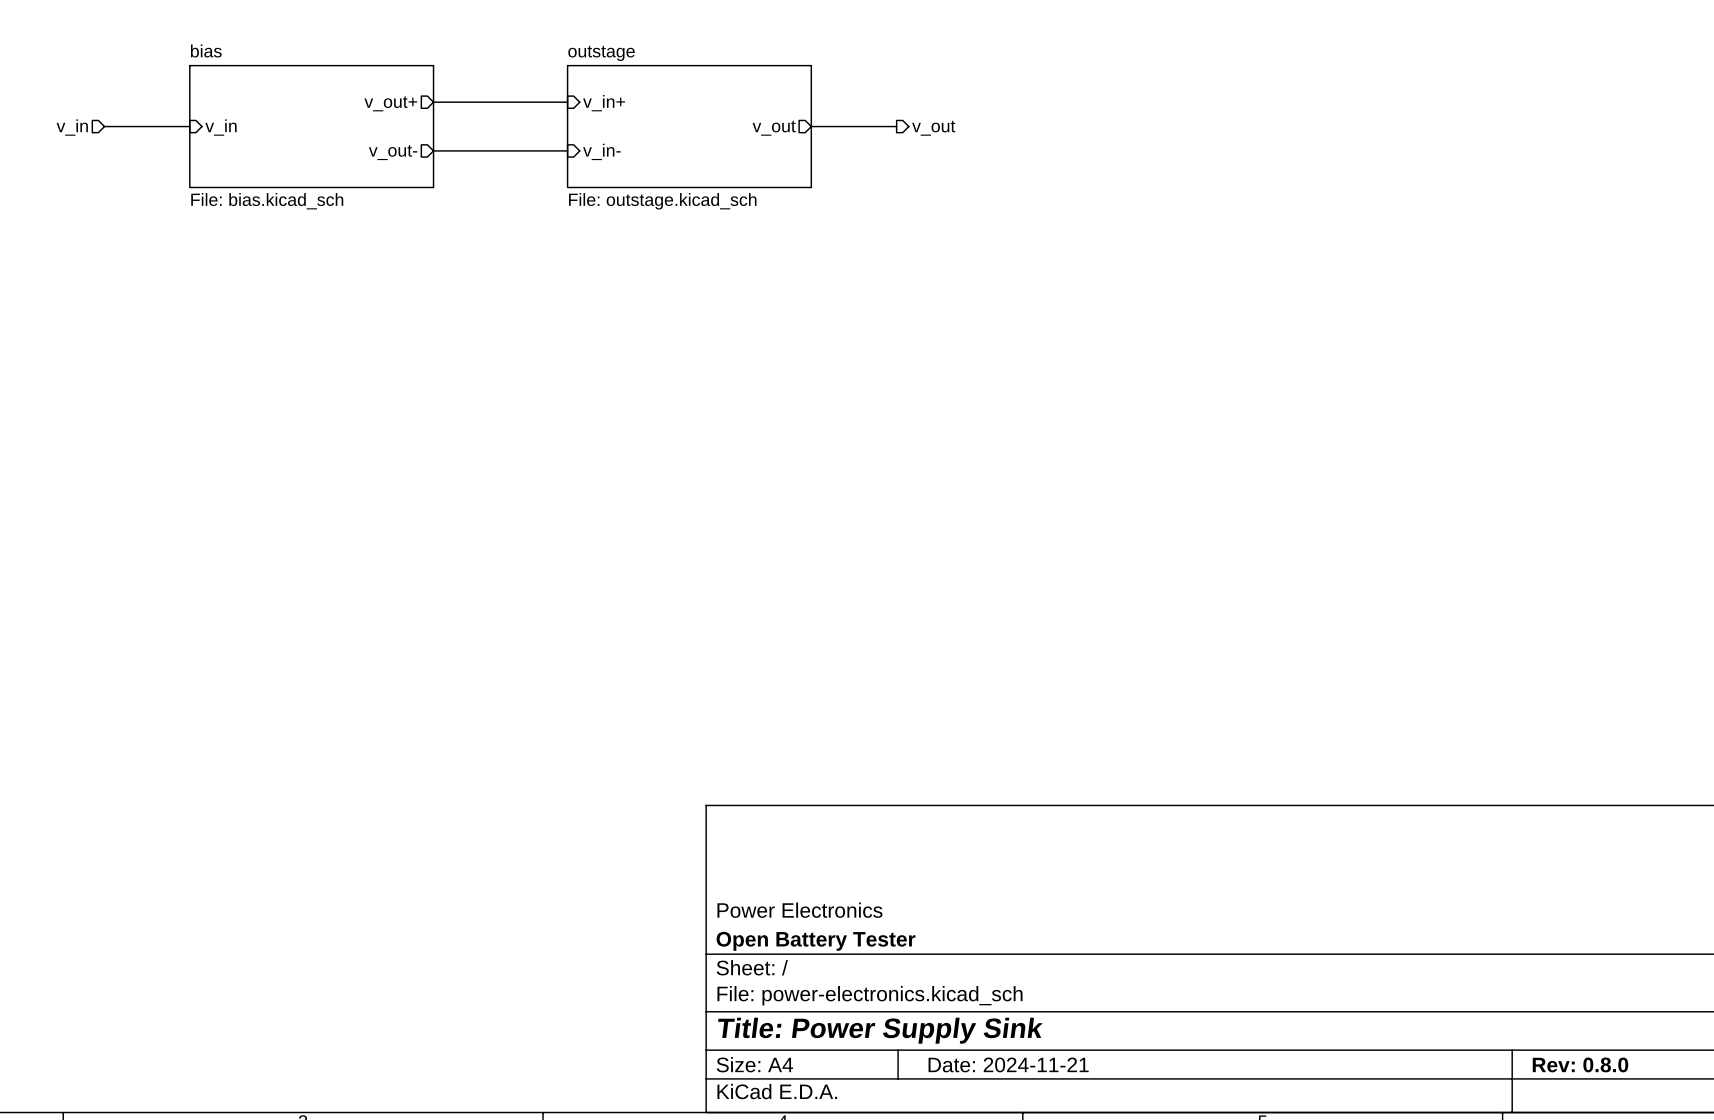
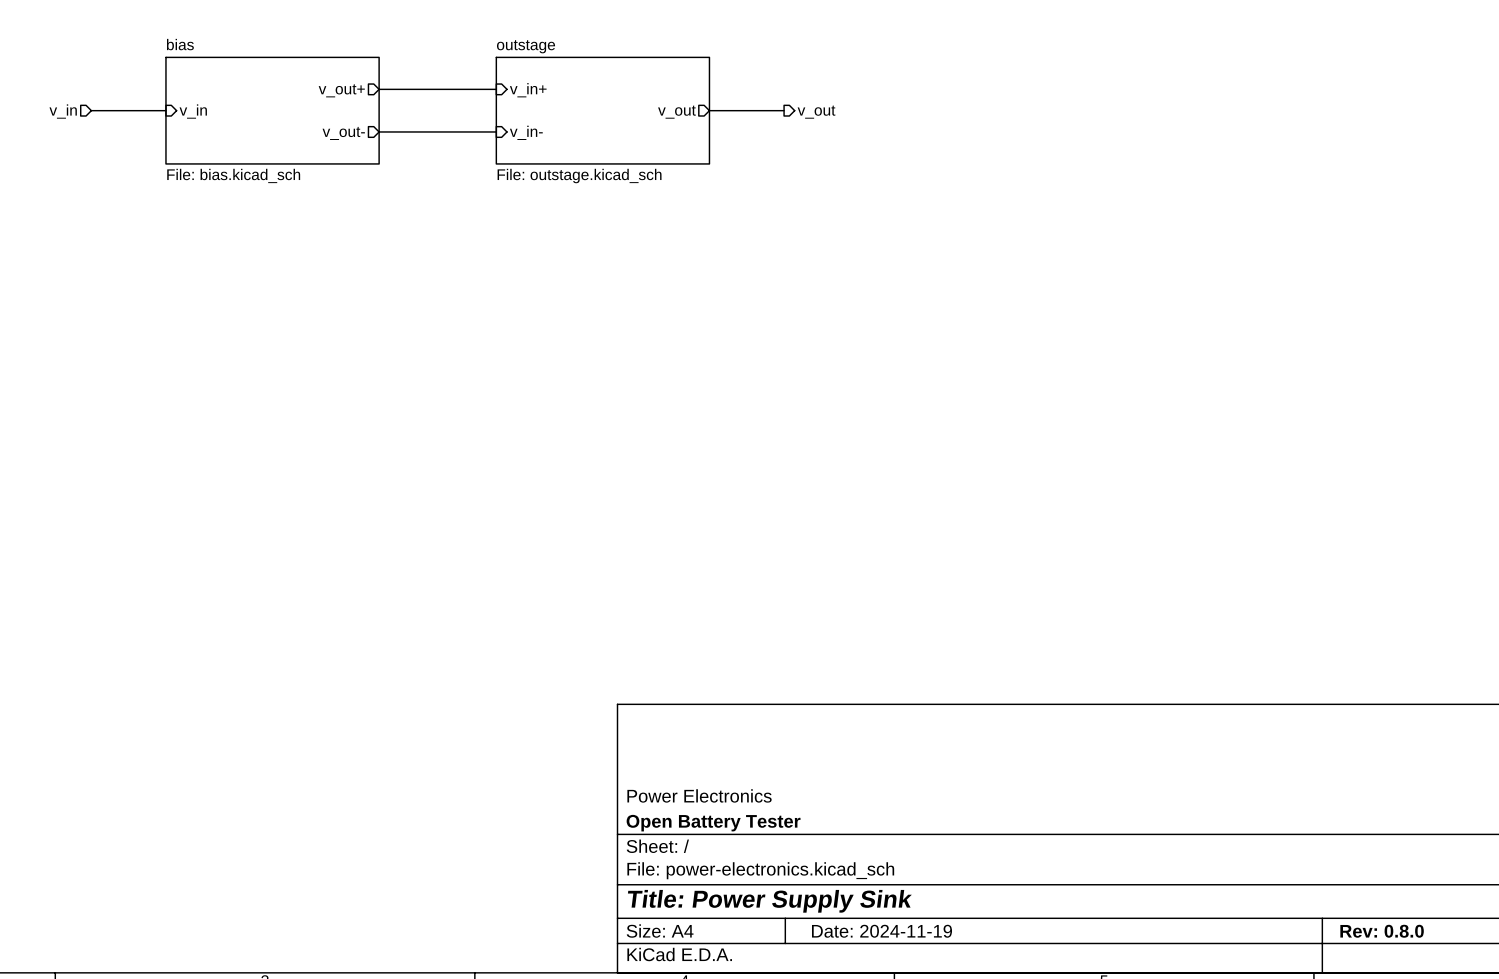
title block: Date: 2024-11-21 (1008, 1064) -> Date: 2024-11-19 (882, 931)

